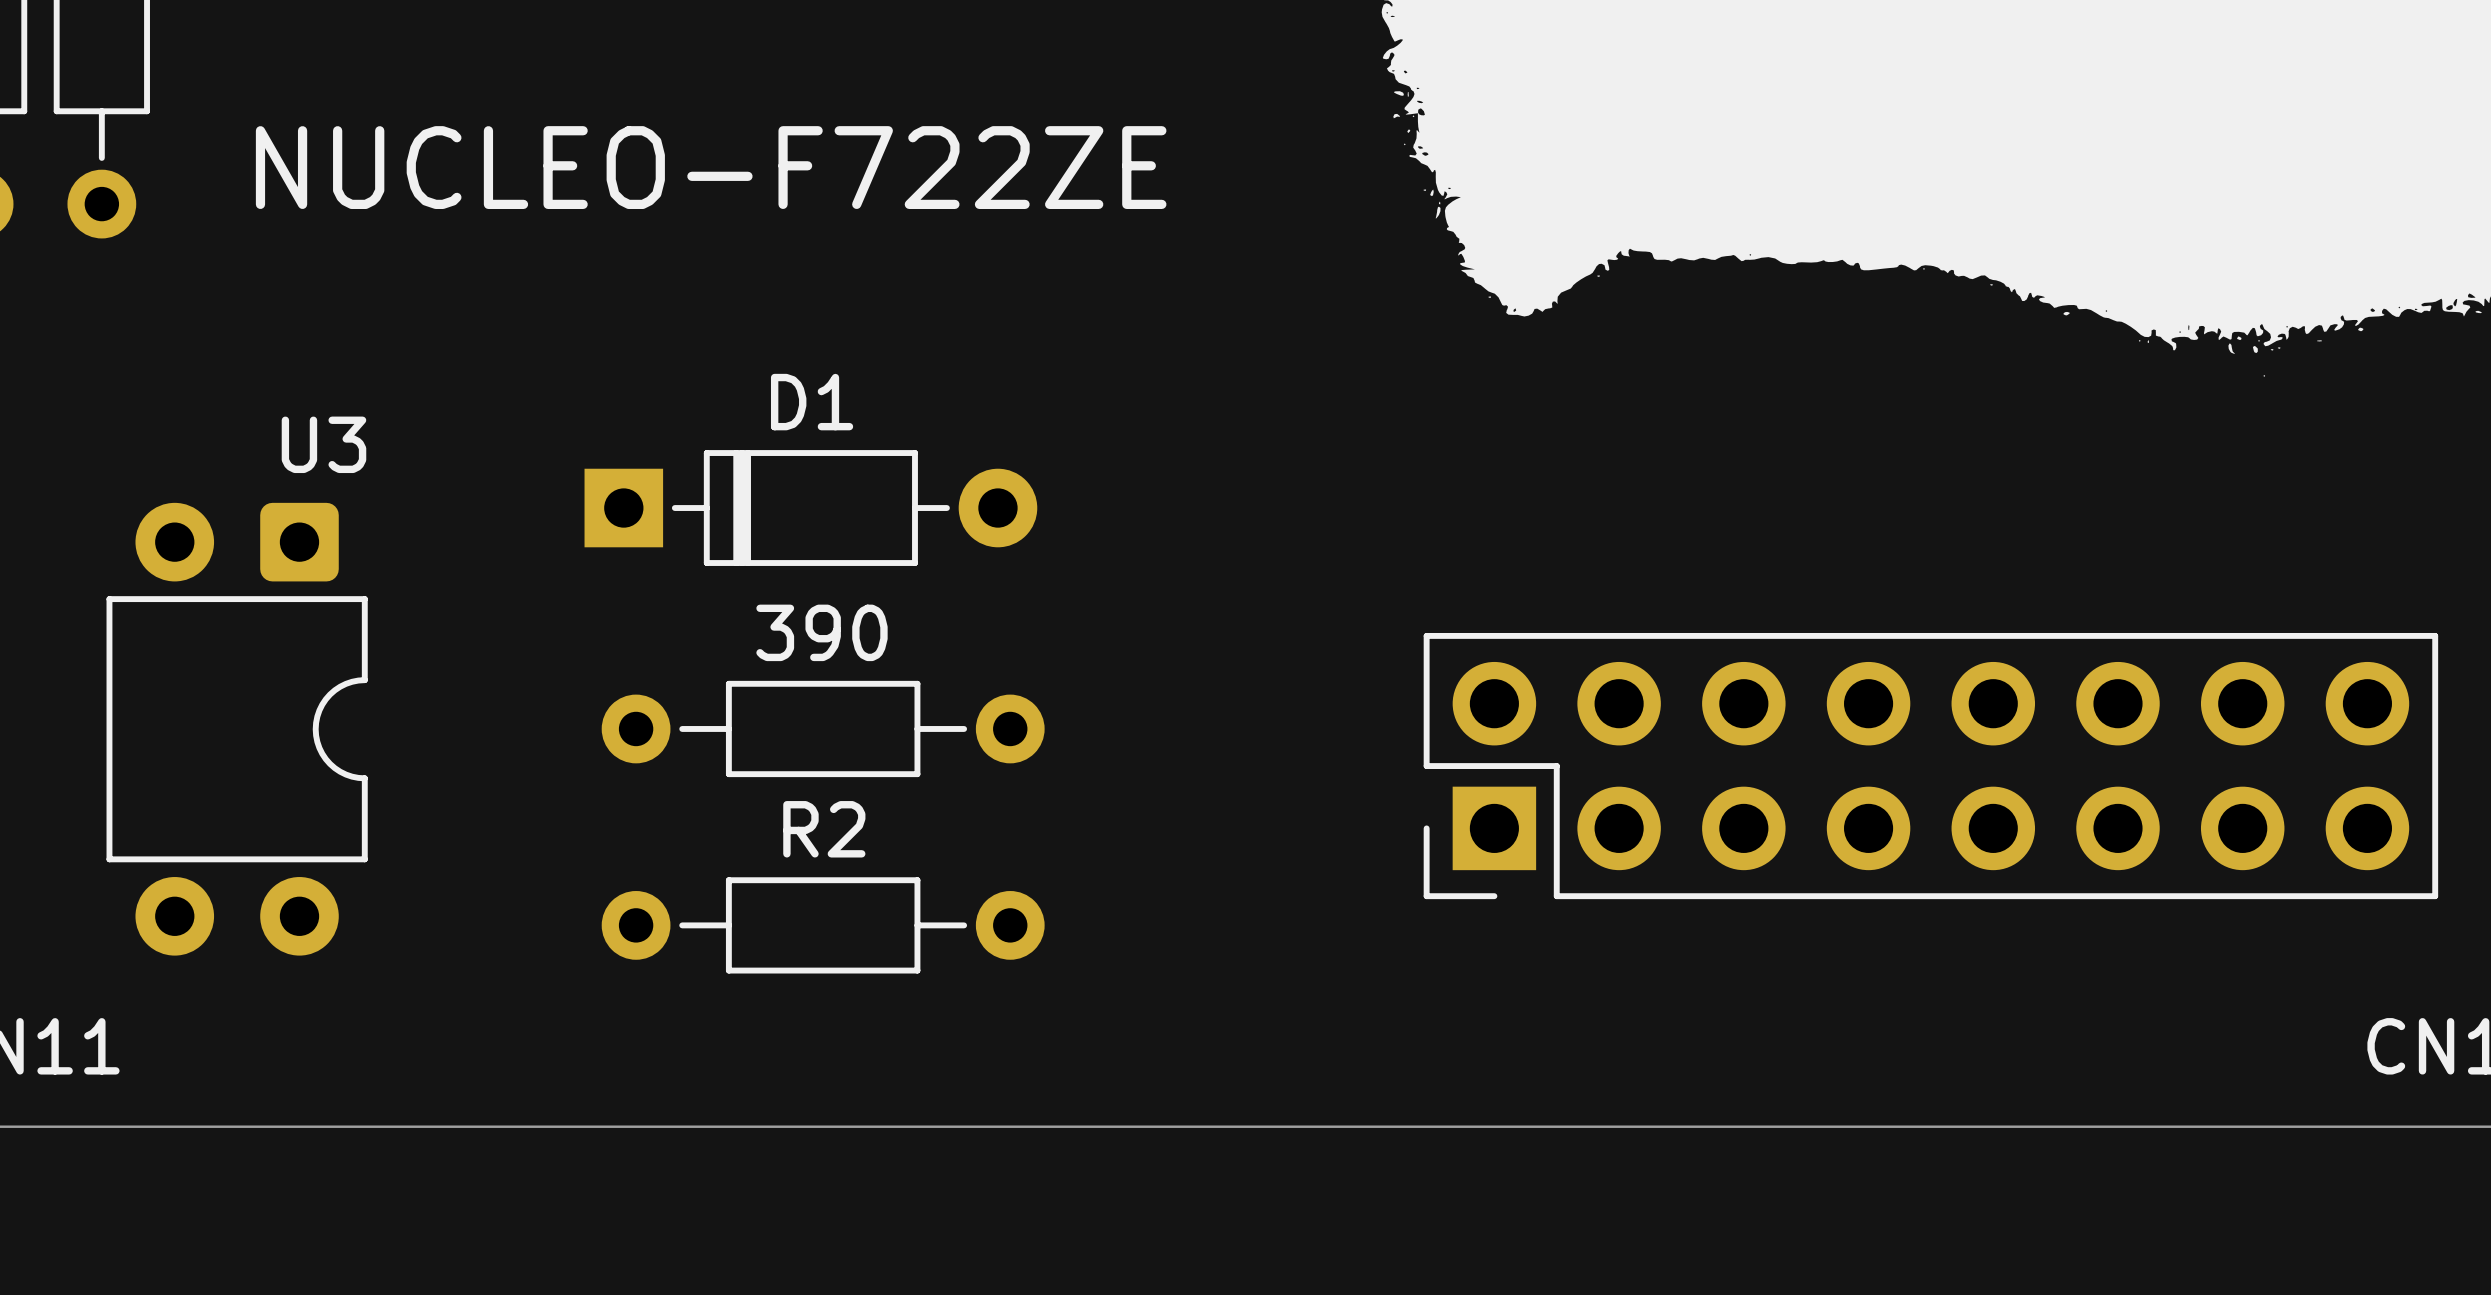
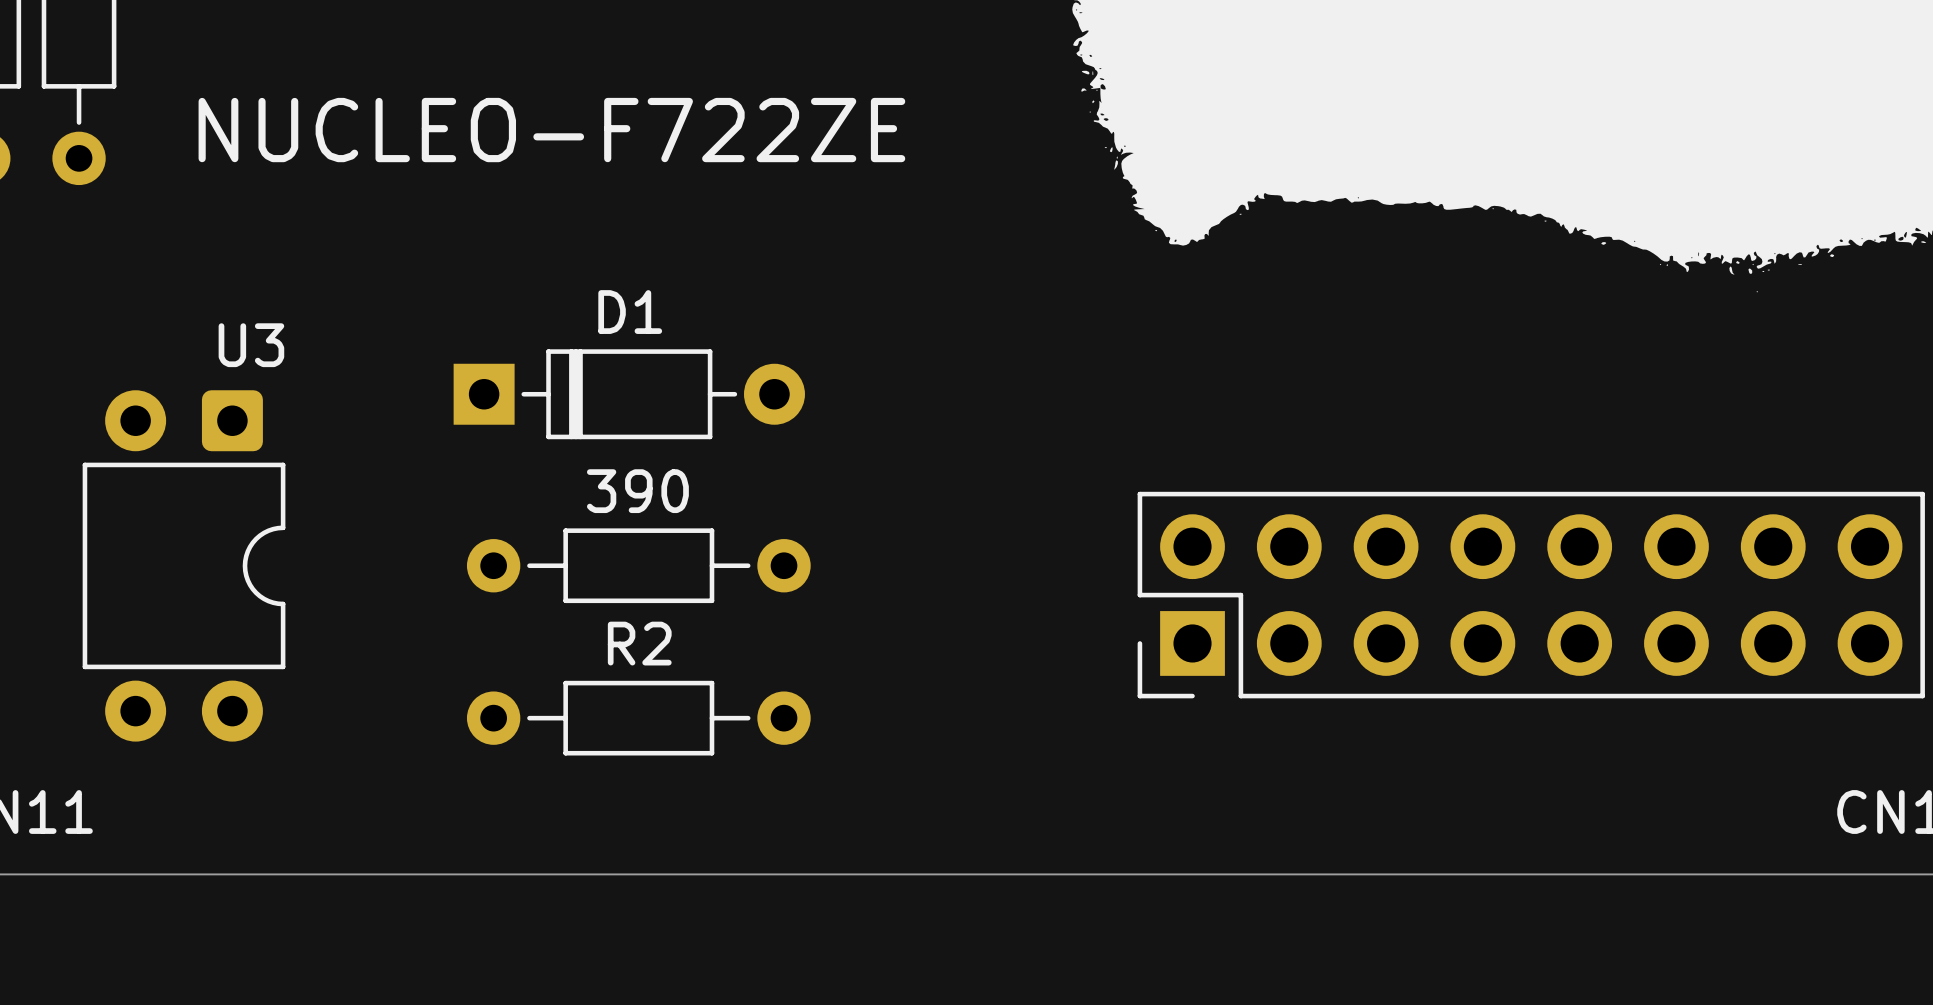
part position: (1930, 766) -> (1531, 595)

